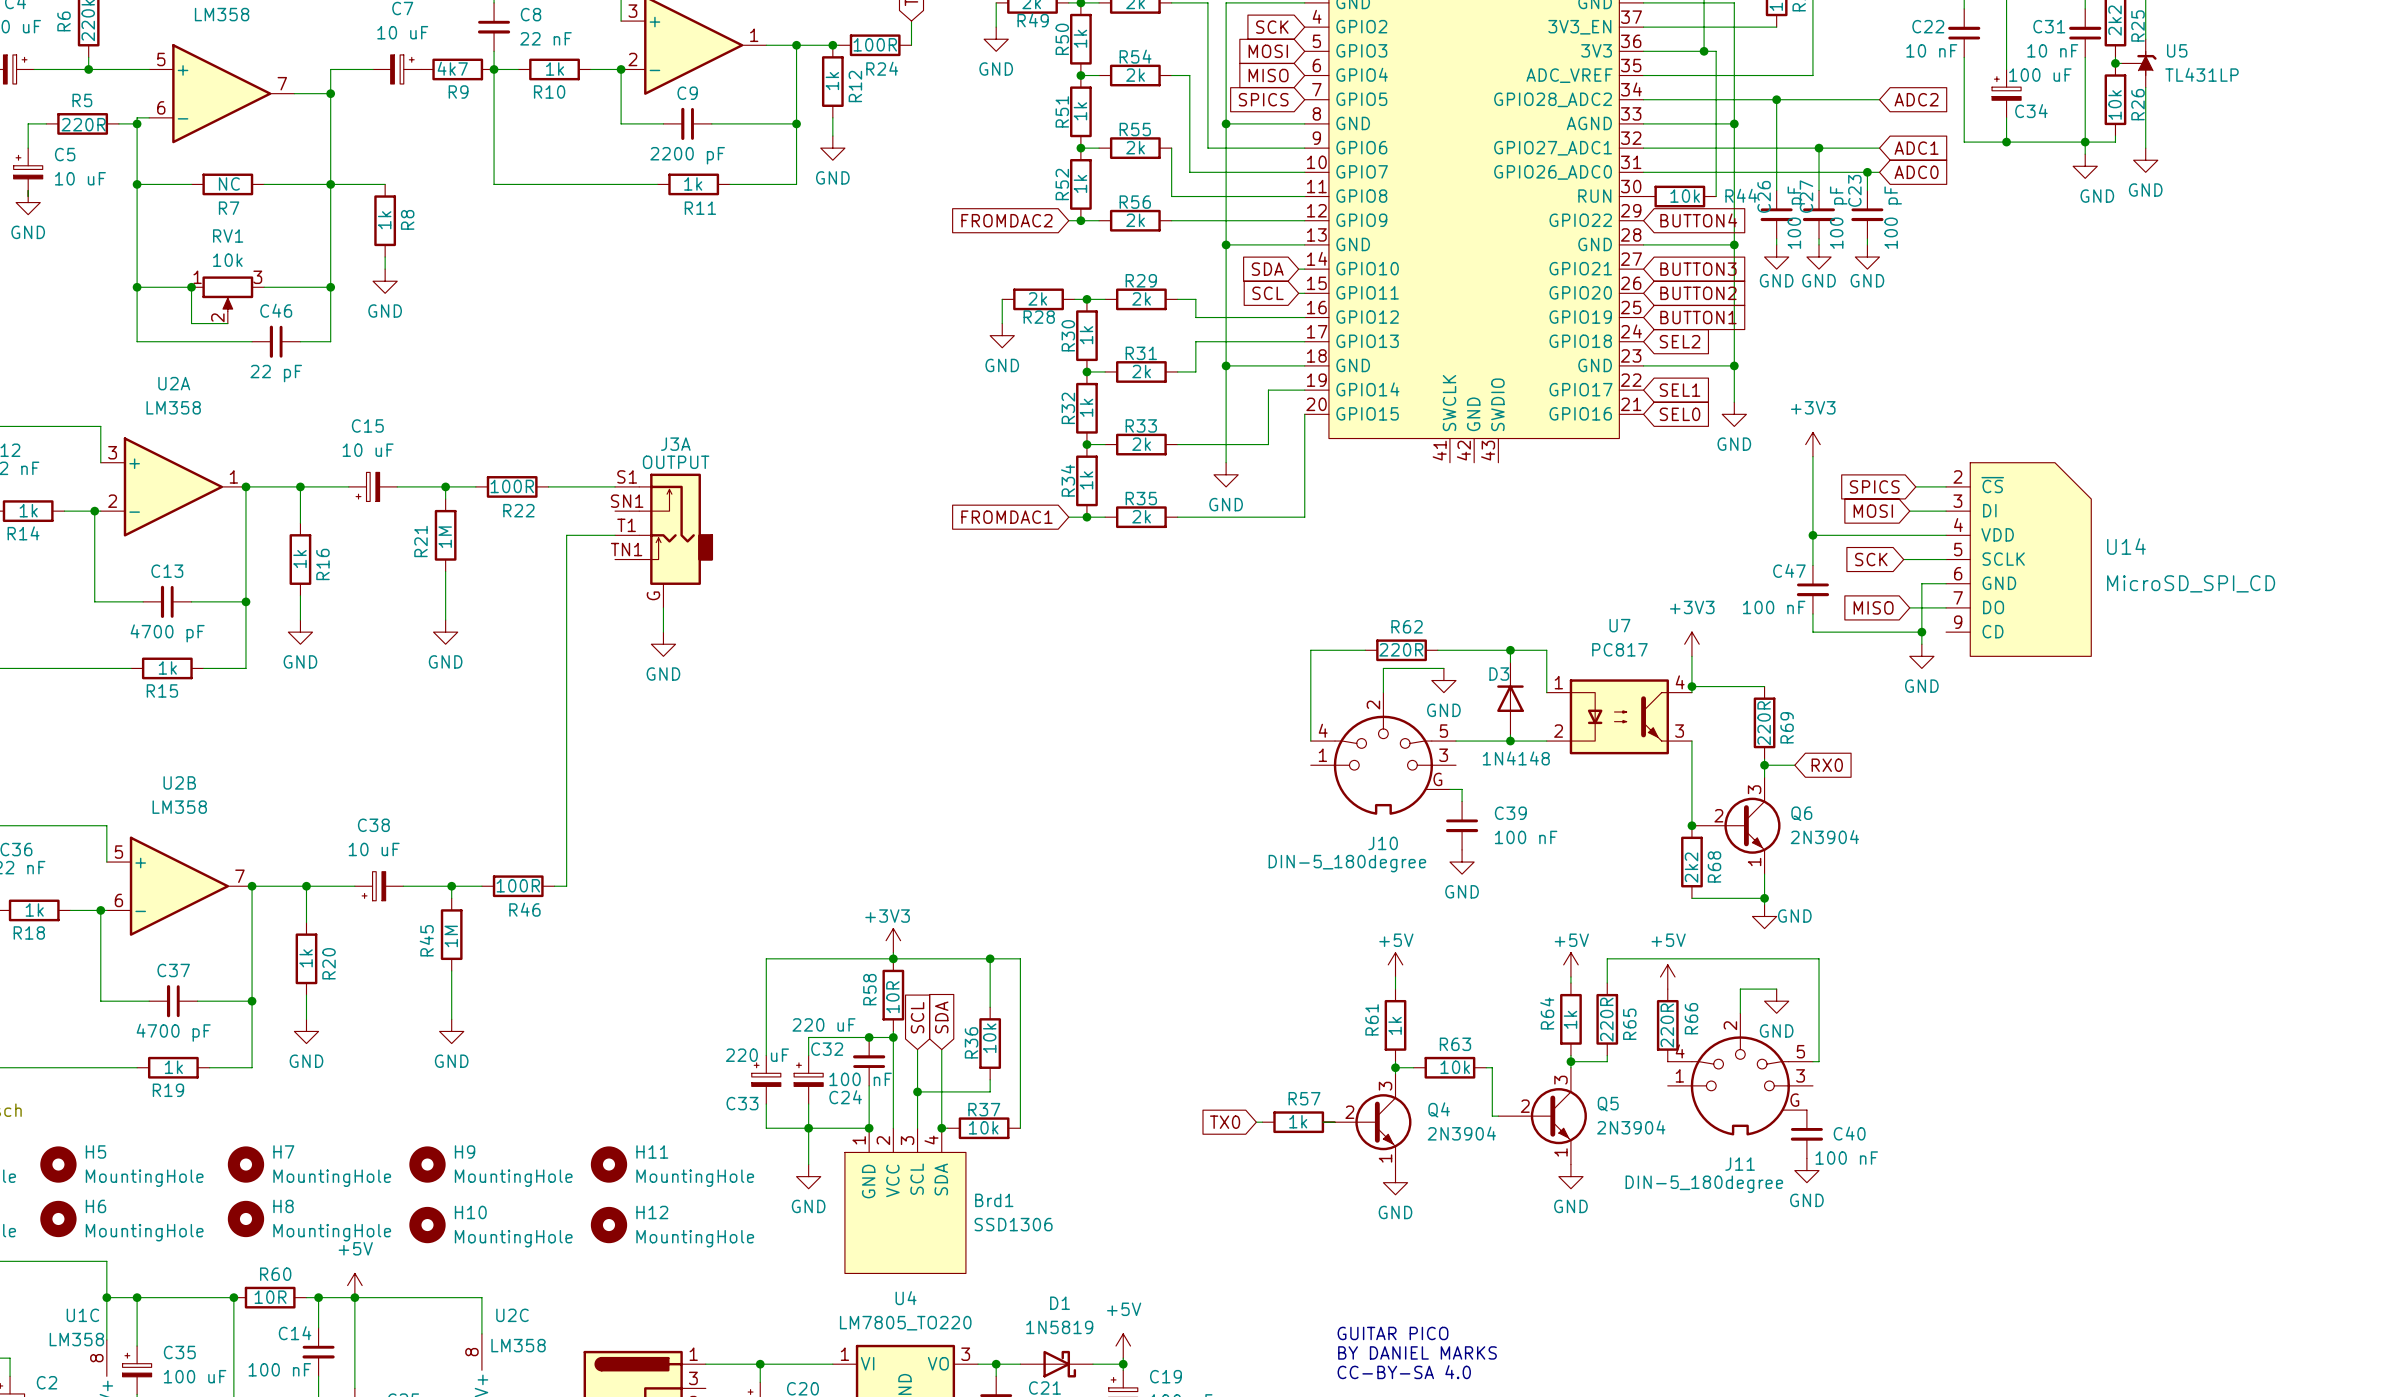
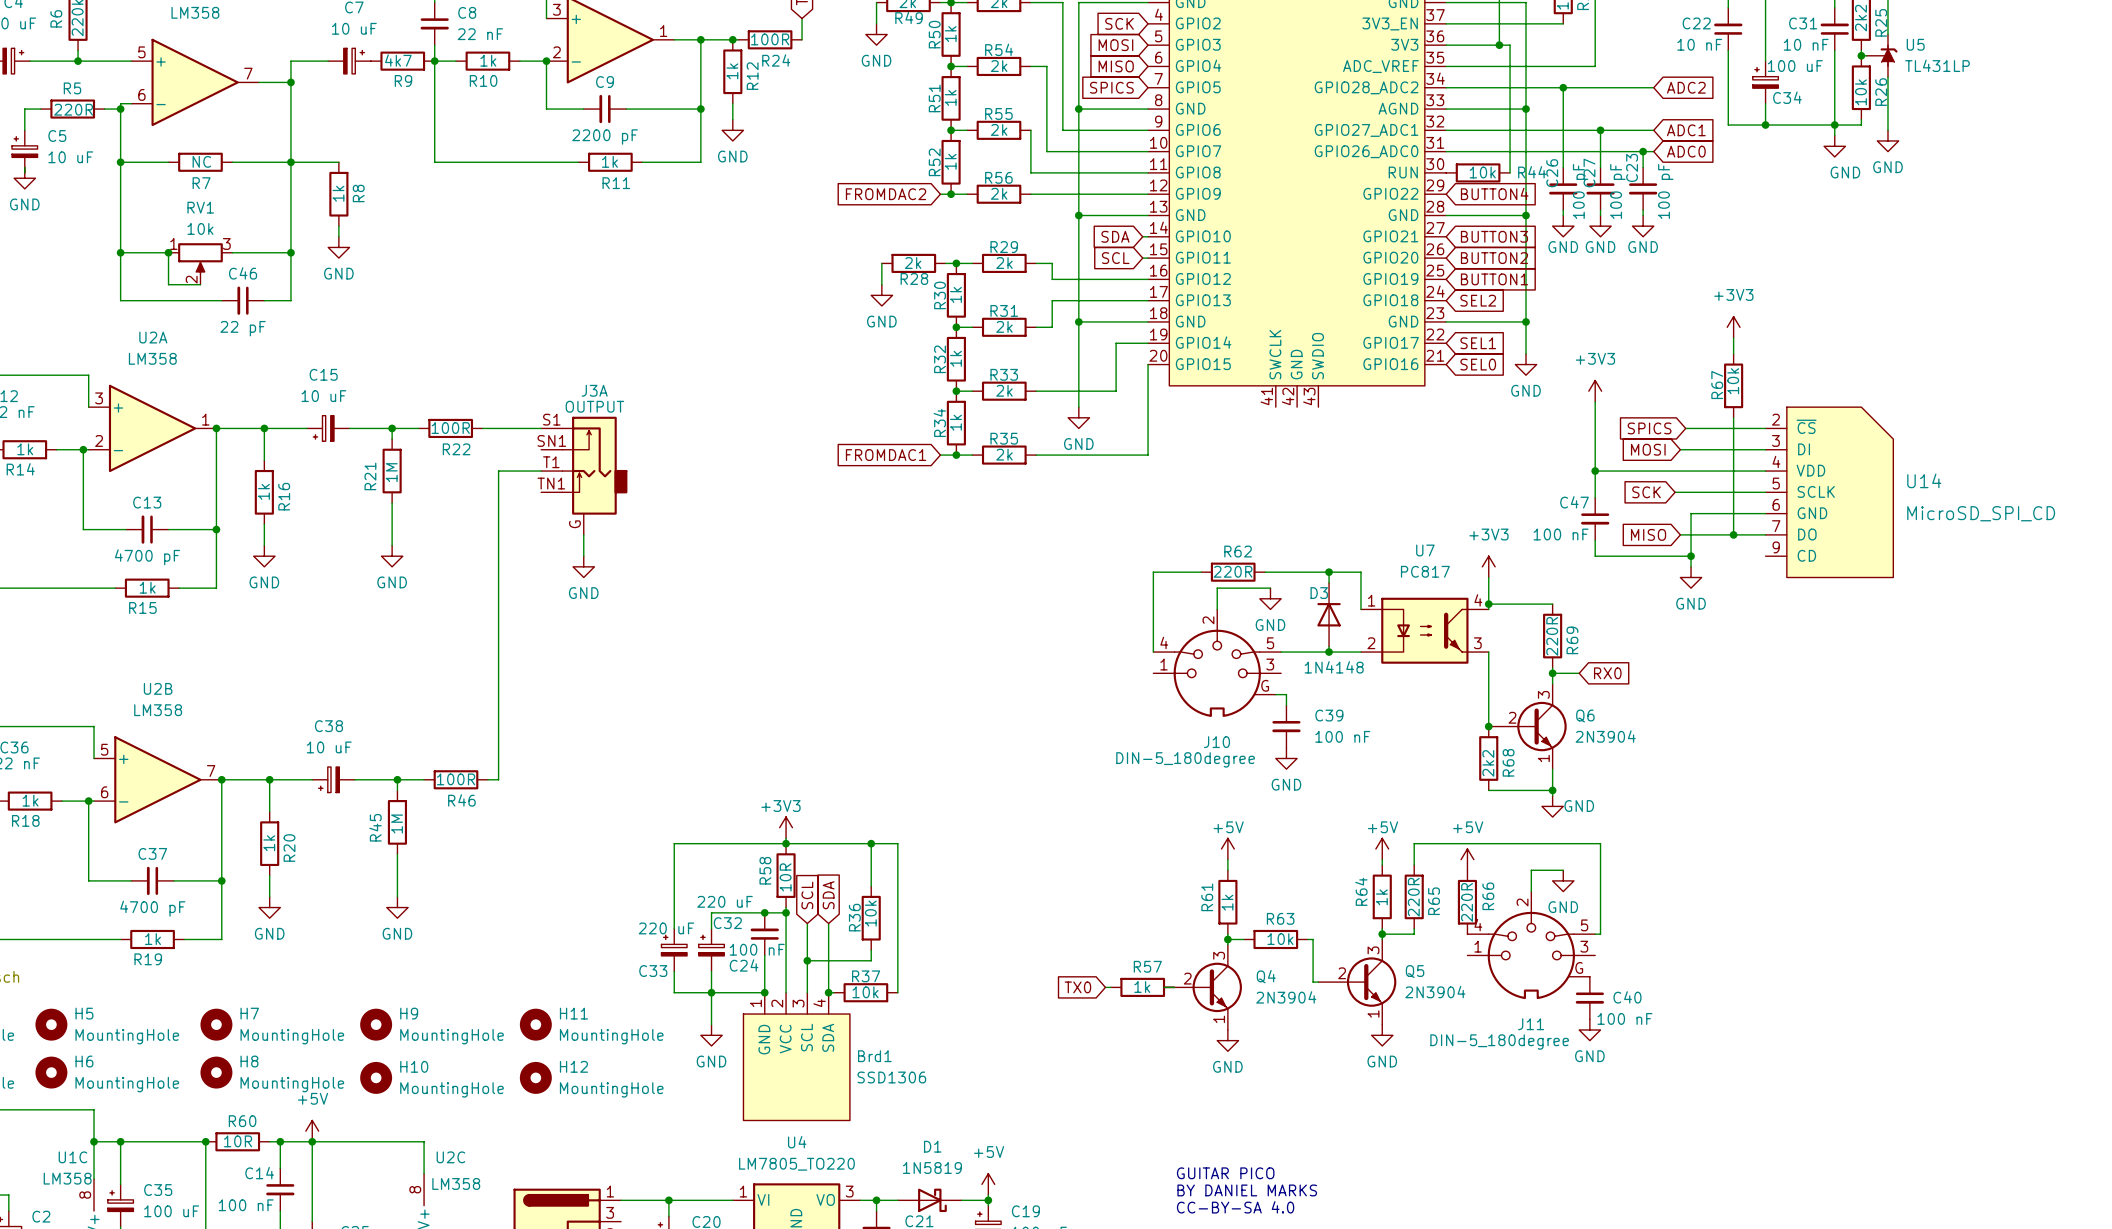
power symbol: none -> +3V3 (1733, 327)
wire: none -> (1733, 337) (1733, 353)
R67: none -> 10k (1733, 385)
U14 position: (2018, 559) -> (1829, 492)
junction: none -> (1733, 534)

